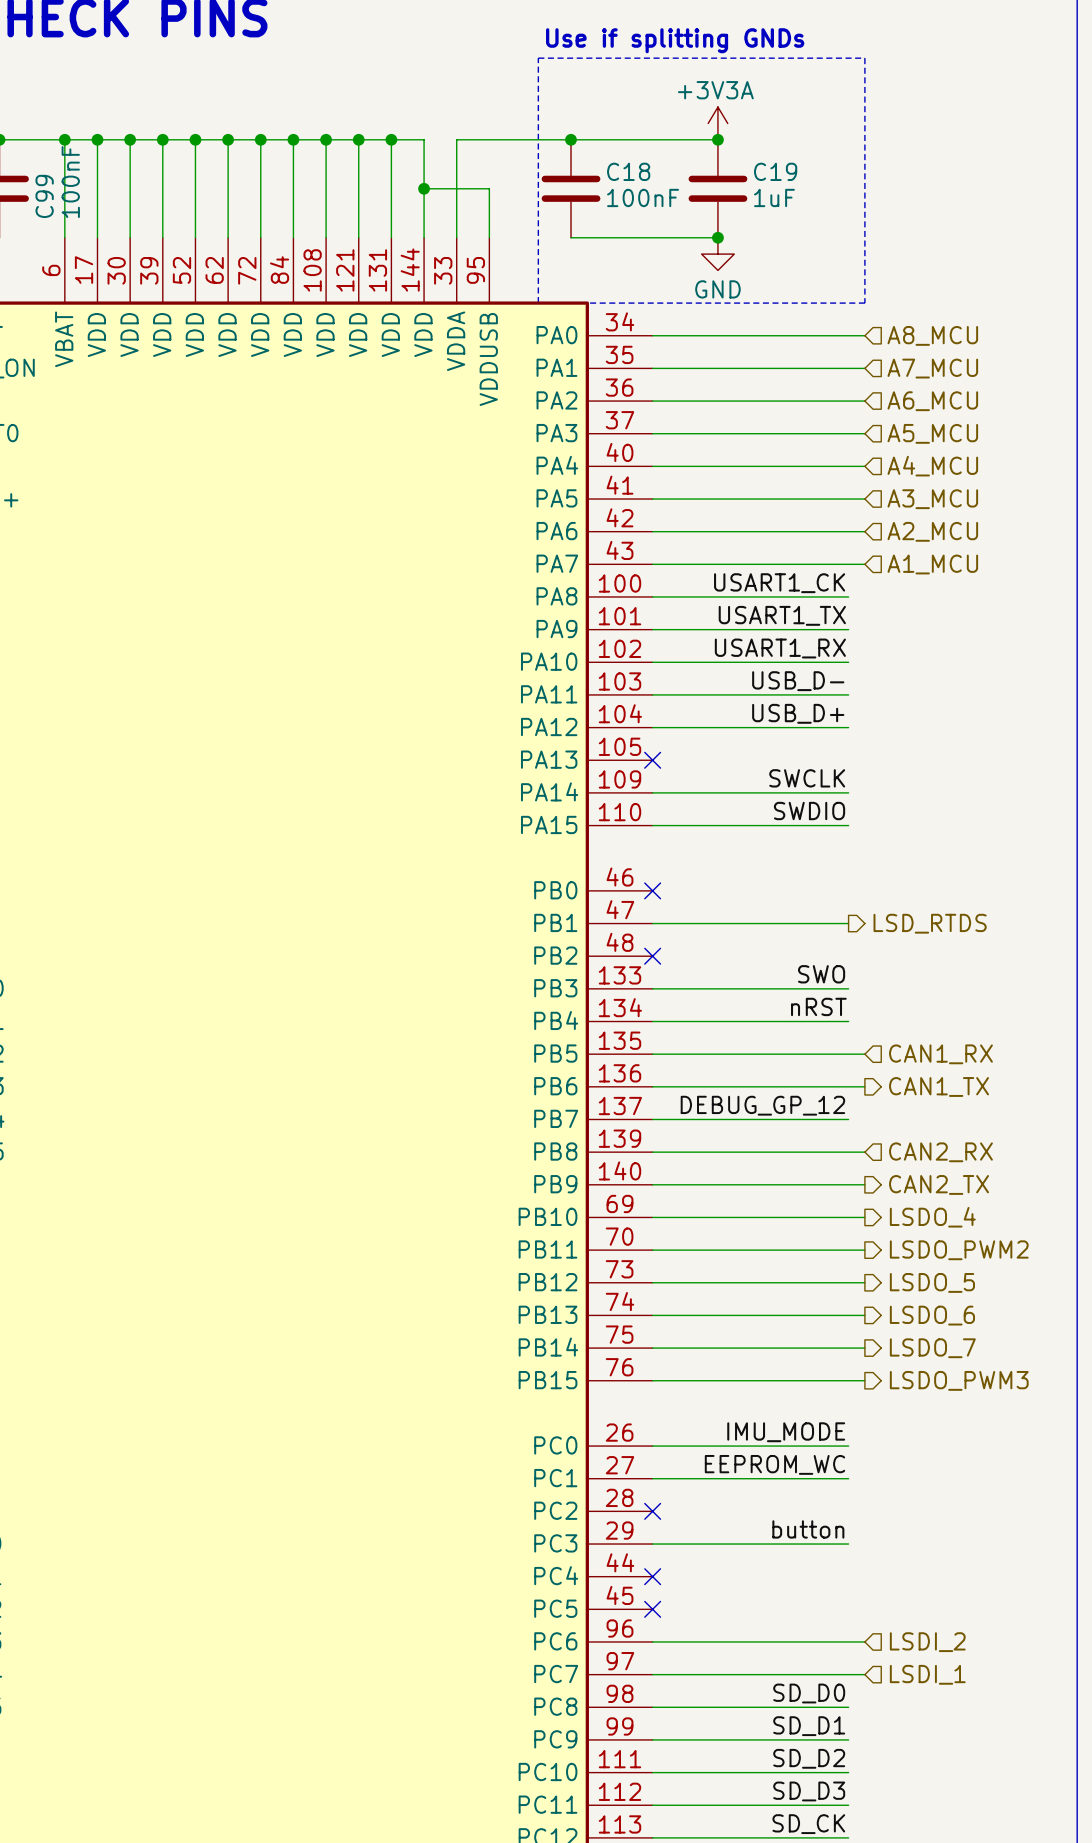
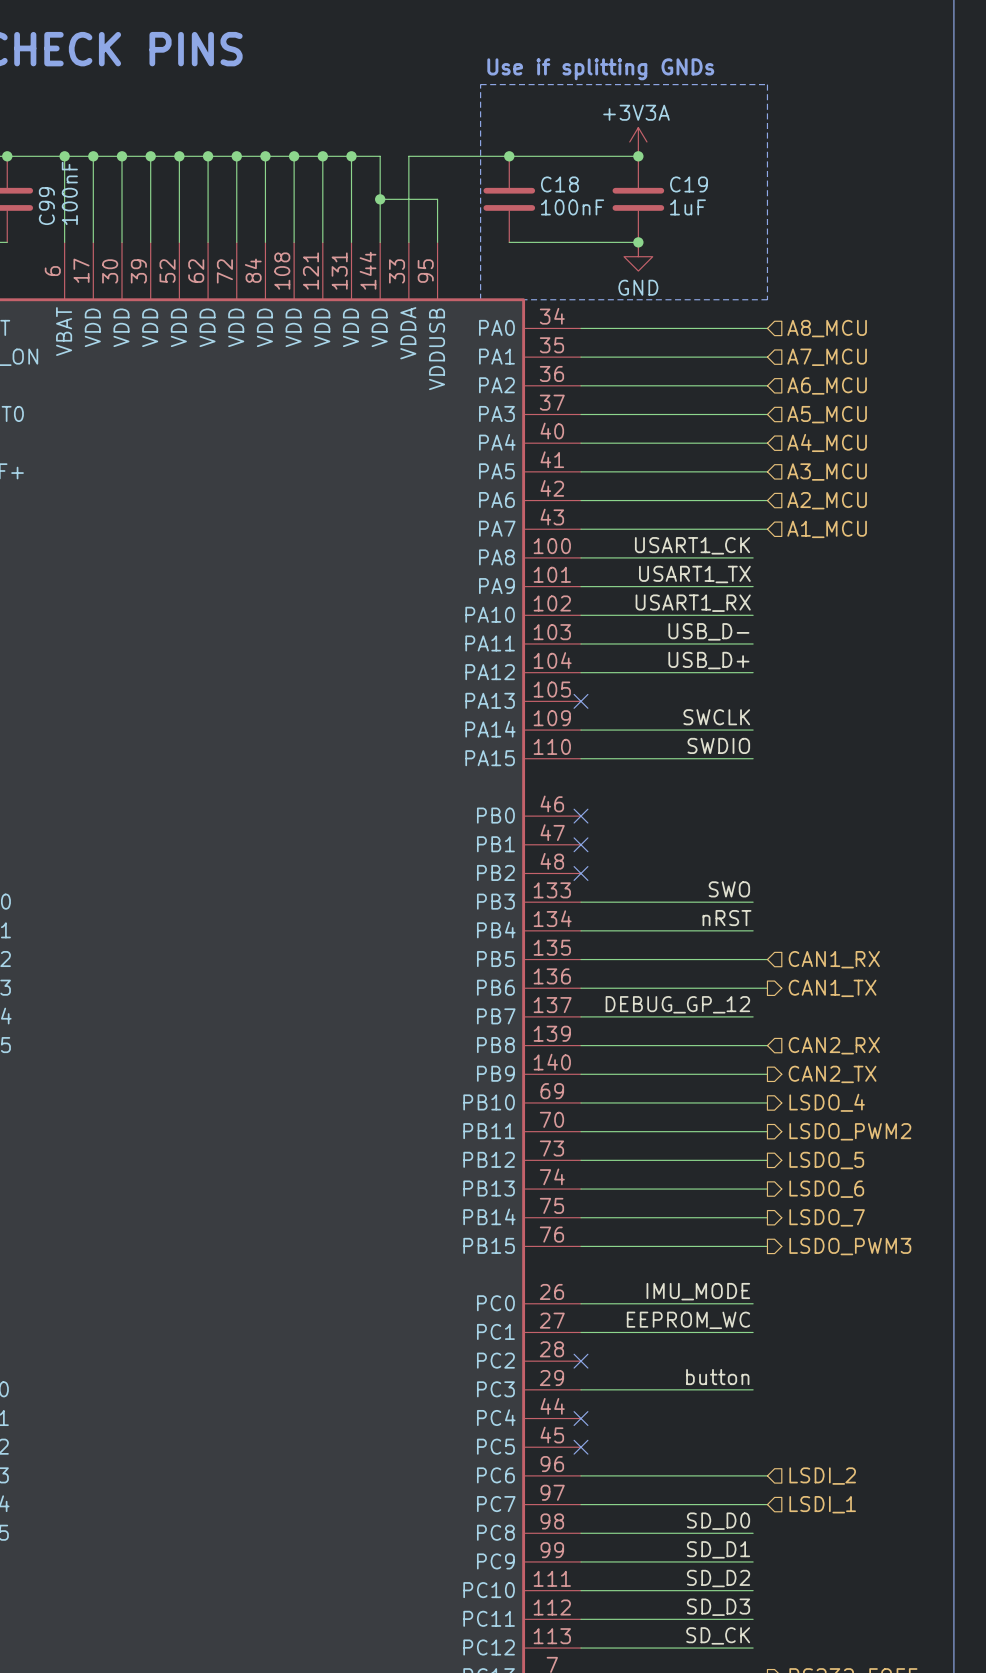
wire: (652, 923) (848, 923) -> none
no-connect mark: none -> (580, 844)
hierarchical label: LSD_RTDS (930, 923) -> none

